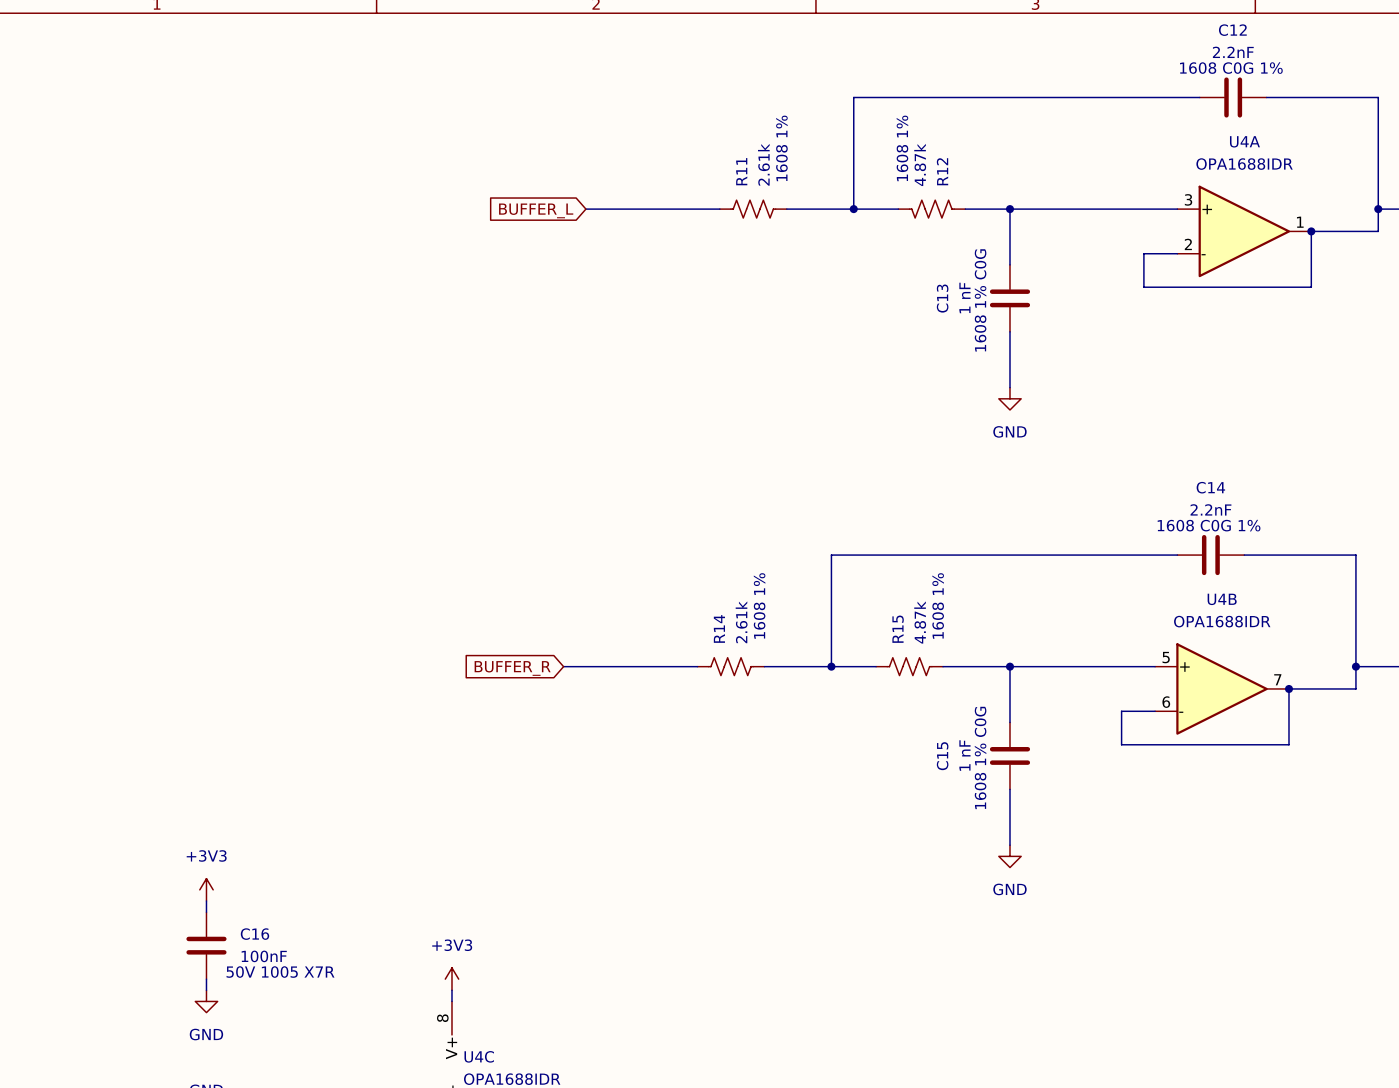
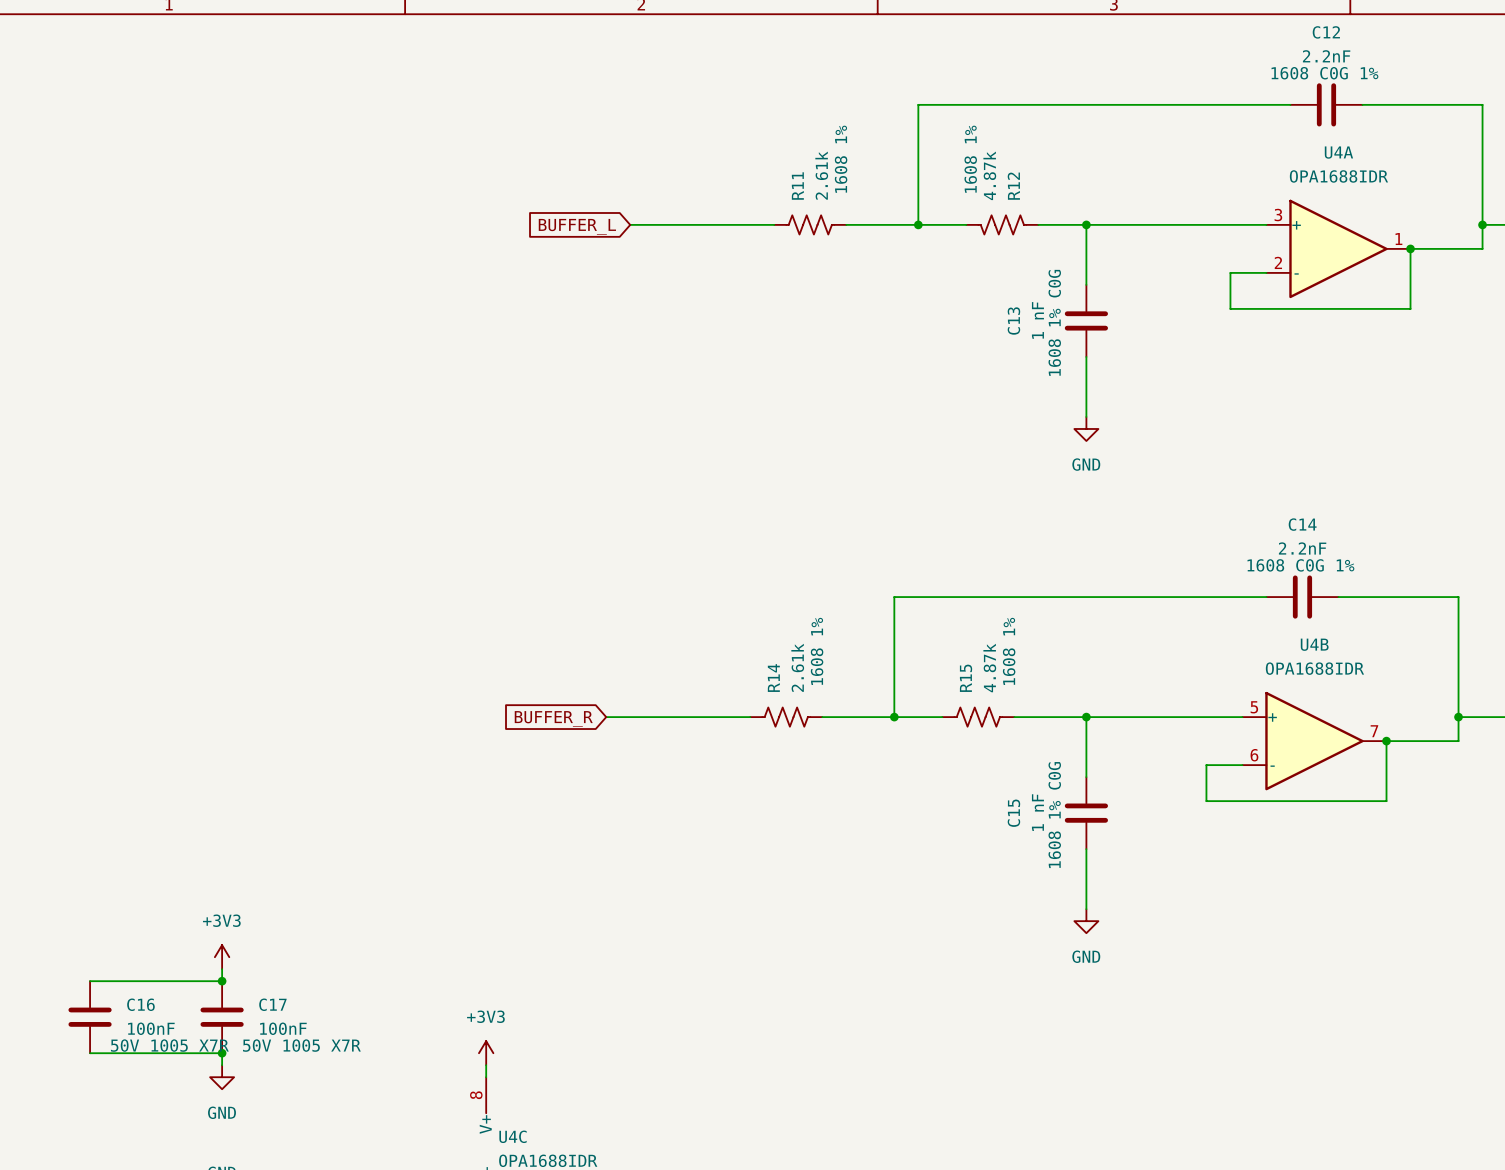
wire: none -> (90, 981) (222, 981)
junction: none -> (222, 981)
C16 name: C16 (254, 934) -> C17 (272, 1004)
C16: none -> 100nF (90, 1017)
wire: none -> (90, 1053) (222, 1053)
junction: none -> (222, 1053)

